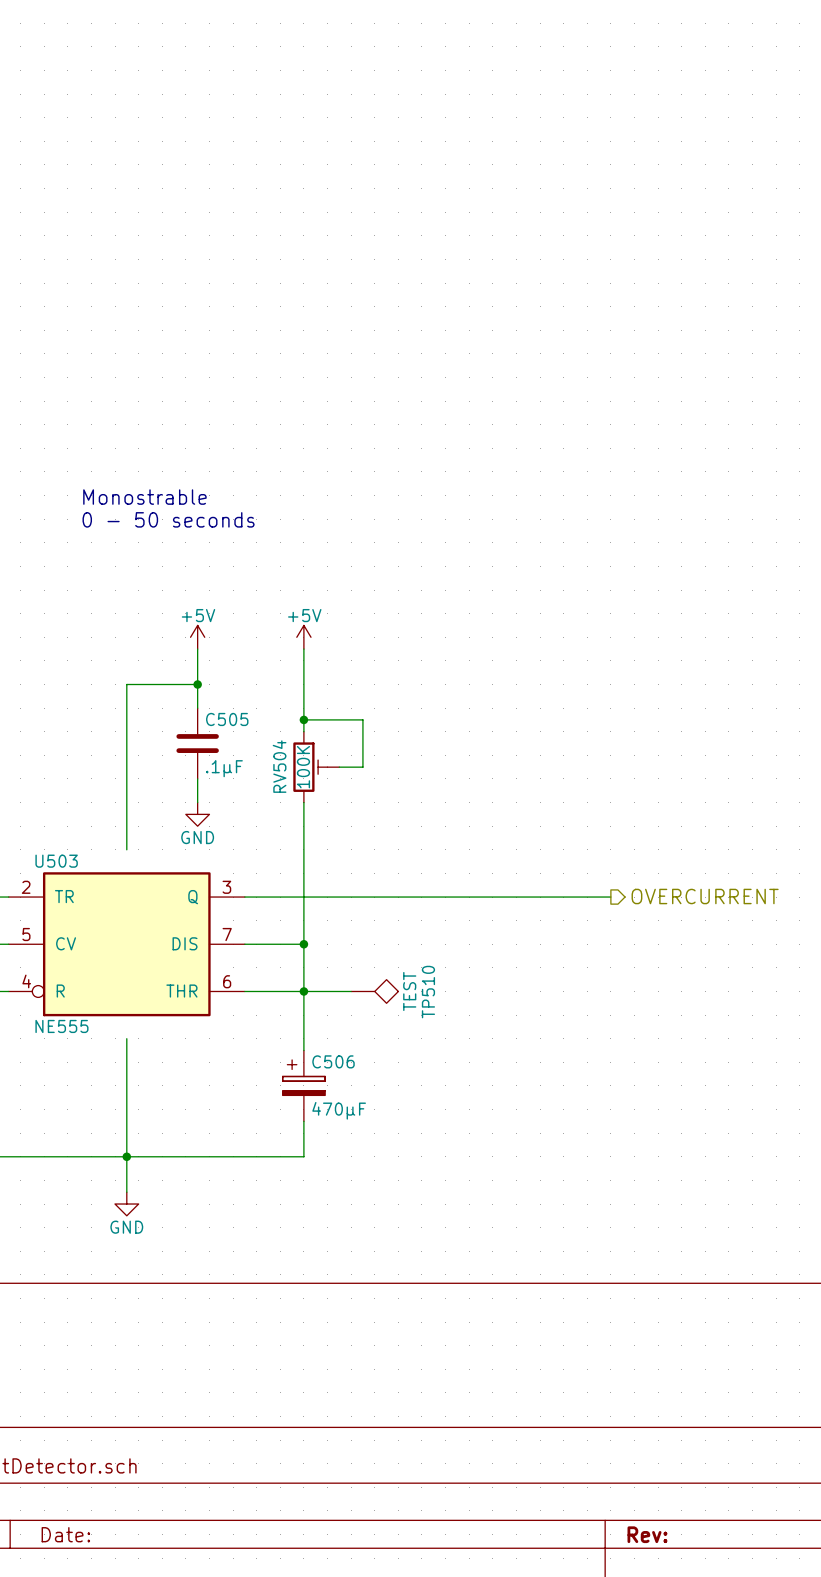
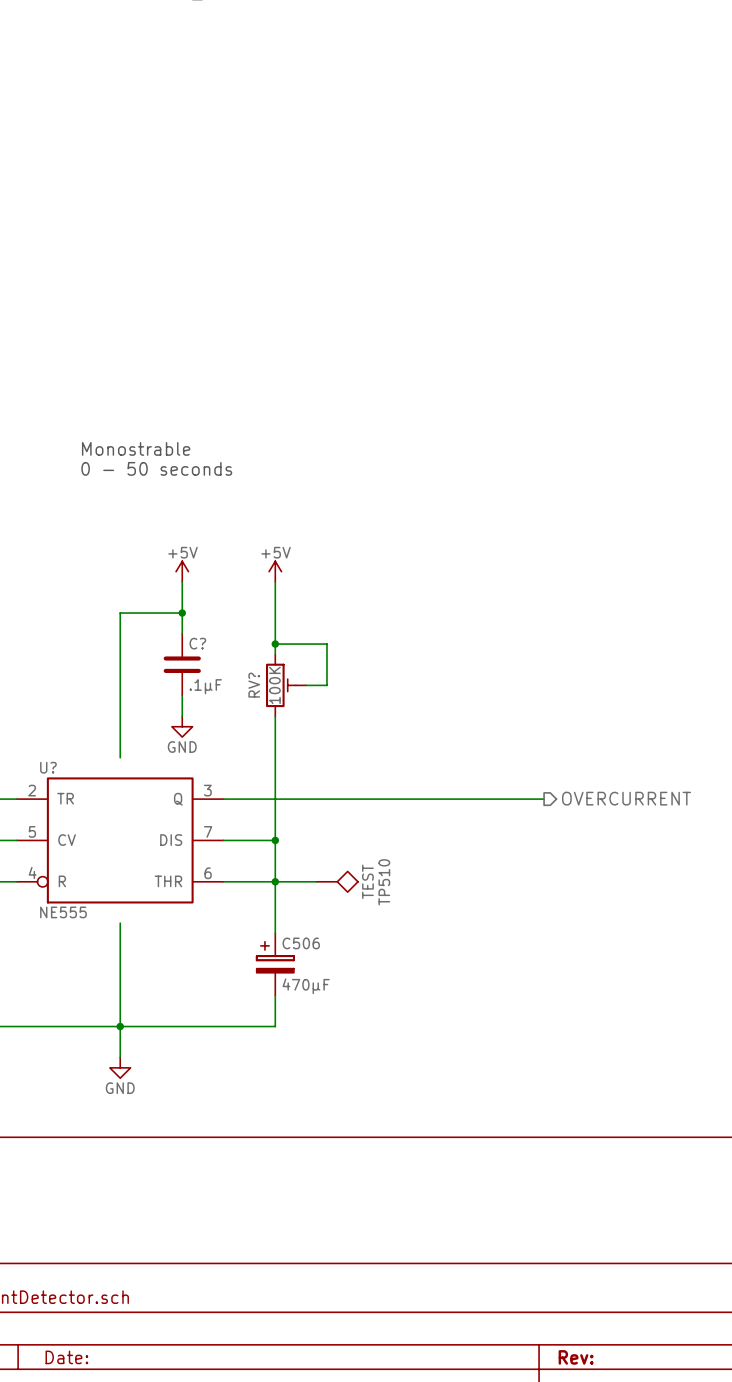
C505 name: C505 (227, 719) -> C? (197, 643)
RV504 name: RV504 (279, 766) -> RV? (254, 685)
U503 name: U503 (56, 861) -> U? (48, 767)

